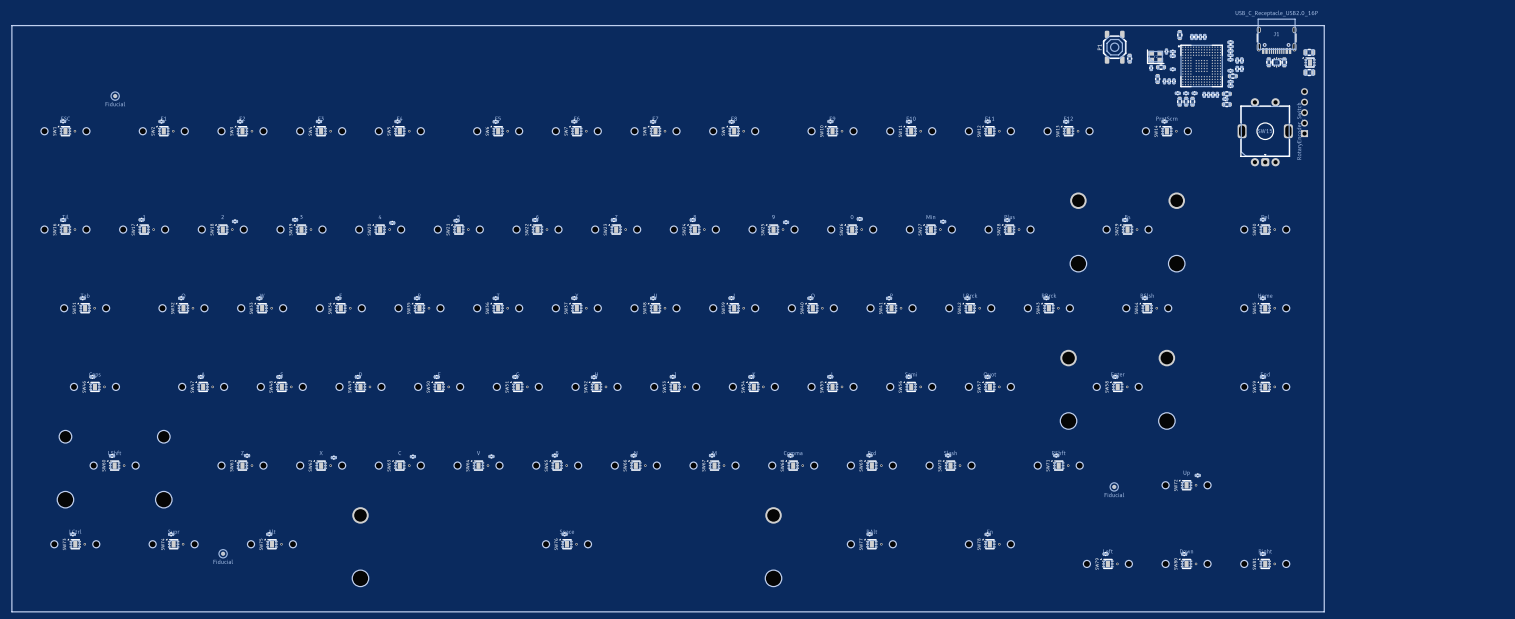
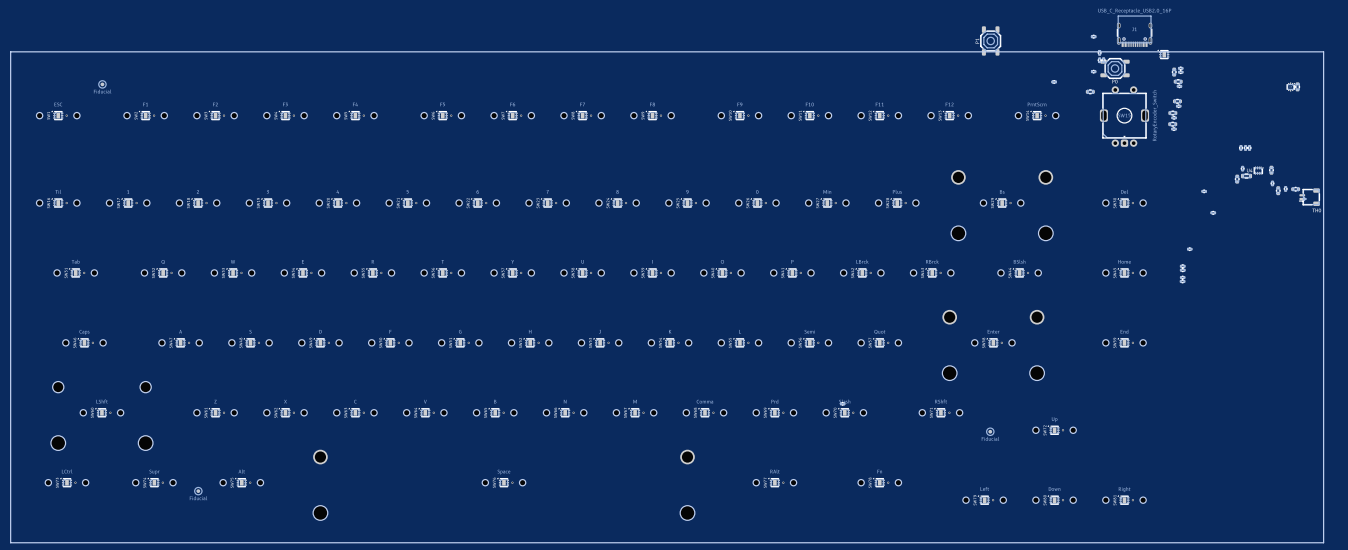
part footprint: [1177, 29, 1183, 41] -> [1284, 186, 1288, 192]
part: (1191, 36) -> none
part: (1196, 36) -> none
part: (1200, 36) -> none
part: (1204, 36) -> none
part footprint: [1227, 44, 1234, 49] -> [1168, 122, 1178, 127]
part: (1230, 50) -> none
part: (1166, 51) -> none
part: (1172, 51) -> none
part: (1309, 52) -> none
part position: (1172, 55) -> (1179, 86)
part: (1230, 55) -> none
part: (1155, 56) -> none
part footprint: [1266, 57, 1272, 68] -> [1270, 180, 1275, 187]
part footprint: [1281, 57, 1287, 68] -> [1179, 268, 1186, 272]
part: (1129, 58) -> none
board edge: (11, 59) (11, 25) (1324, 25) (1324, 611) -> (10, 51) (1323, 51) (1323, 542) (1176, 542)
part position: (1230, 59) -> (1180, 68)
part position: (1241, 60) -> (1242, 168)
part: (1277, 62) -> none
part: (1200, 65) -> none
part rotation: 0° (1161, 67) -> 90° clockwise (1297, 86)
part position: (1161, 67) -> (1297, 86)
part: (1151, 68) -> none
part: (1172, 69) -> none
part: (1230, 70) -> none
part: (1309, 72) -> none
part footprint: [1227, 73, 1238, 79] -> [1179, 264, 1186, 268]
part: none -> (1115, 68)
part: (1157, 79) -> none
part: (1164, 81) -> none
part: (1169, 81) -> none
part: (1173, 81) -> none
part: none -> (1174, 72)
part: (1230, 86) -> none
part position: (1177, 93) -> (1180, 72)
part: (1194, 93) -> none
part position: (1226, 93) -> (1178, 81)
part: (1204, 94) -> none
part: (1208, 94) -> none
part: (1212, 94) -> none
part: (1217, 94) -> none
part footprint: [1190, 96, 1195, 107] -> [1239, 144, 1243, 151]
part: (1225, 99) -> none
part: none -> (1291, 86)
part rotation: 0° (1179, 101) -> 90° clockwise (1177, 101)
part position: (1179, 101) -> (1177, 101)
part rotation: 0° (1186, 101) -> 90° clockwise (1172, 113)
part position: (1186, 101) -> (1172, 113)
part: (1304, 112) -> none
part: (63, 121) -> none
part: (161, 121) -> none
part: (240, 121) -> none
part: (318, 121) -> none
part: (397, 121) -> none
part: (495, 121) -> none
part: (574, 121) -> none
part: (653, 121) -> none
part: (731, 121) -> none
part: (830, 121) -> none
part: (908, 121) -> none
part: (987, 121) -> none
part: (1066, 121) -> none
part: (1164, 121) -> none
part: none -> (1173, 129)
part: none -> (1245, 147)
part: none -> (1249, 147)
part: none -> (1271, 170)
part: none -> (1258, 170)
part: none -> (1246, 176)
part: none -> (1237, 179)
part: none -> (1295, 189)
part: none -> (1278, 190)
part: (859, 218) -> none
part: (141, 219) -> none
part: (295, 219) -> none
part: (1262, 219) -> none
part: (63, 220) -> none
part: (456, 220) -> none
part: (535, 220) -> none
part: (613, 220) -> none
part: (692, 220) -> none
part: (1007, 220) -> none
part: (1125, 220) -> none
part: (234, 221) -> none
part: (943, 221) -> none
part: (392, 222) -> none
part: (786, 222) -> none
part: none -> (1309, 197)
part: none -> (1213, 212)
part: (82, 298) -> none
part: (181, 298) -> none
part: (259, 298) -> none
part: (338, 298) -> none
part position: (416, 298) -> (1182, 277)
part position: (495, 298) -> (1189, 249)
part: (574, 298) -> none
part: (653, 298) -> none
part: (731, 298) -> none
part: (810, 298) -> none
part: (889, 298) -> none
part: (967, 298) -> none
part: (1046, 298) -> none
part: (1144, 298) -> none
part: (1262, 298) -> none
part: none -> (1182, 281)
part: (92, 376) -> none
part: (200, 376) -> none
part: (279, 376) -> none
part: (357, 376) -> none
part: (436, 376) -> none
part: (515, 376) -> none
part: (672, 376) -> none
part: (751, 376) -> none
part: (830, 376) -> none
part: (908, 376) -> none
part position: (1115, 376) -> (1204, 191)
part: (1262, 376) -> none
part: (594, 377) -> none
part: (987, 377) -> none
part position: (112, 455) -> (1178, 106)
part: (247, 455) -> none
part: (554, 455) -> none
part: (633, 455) -> none
part: (712, 455) -> none
part: (790, 455) -> none
part: (869, 455) -> none
part: (1056, 455) -> none
part: (412, 456) -> none
part: (491, 456) -> none
part: (333, 457) -> none
part position: (1197, 475) -> (1174, 117)
part: (72, 534) -> none
part: (171, 534) -> none
part: (269, 534) -> none
part: (564, 534) -> none
part: (869, 534) -> none
part: (987, 534) -> none
part: (1105, 553) -> none
part: (1184, 554) -> none
part: (1262, 554) -> none

